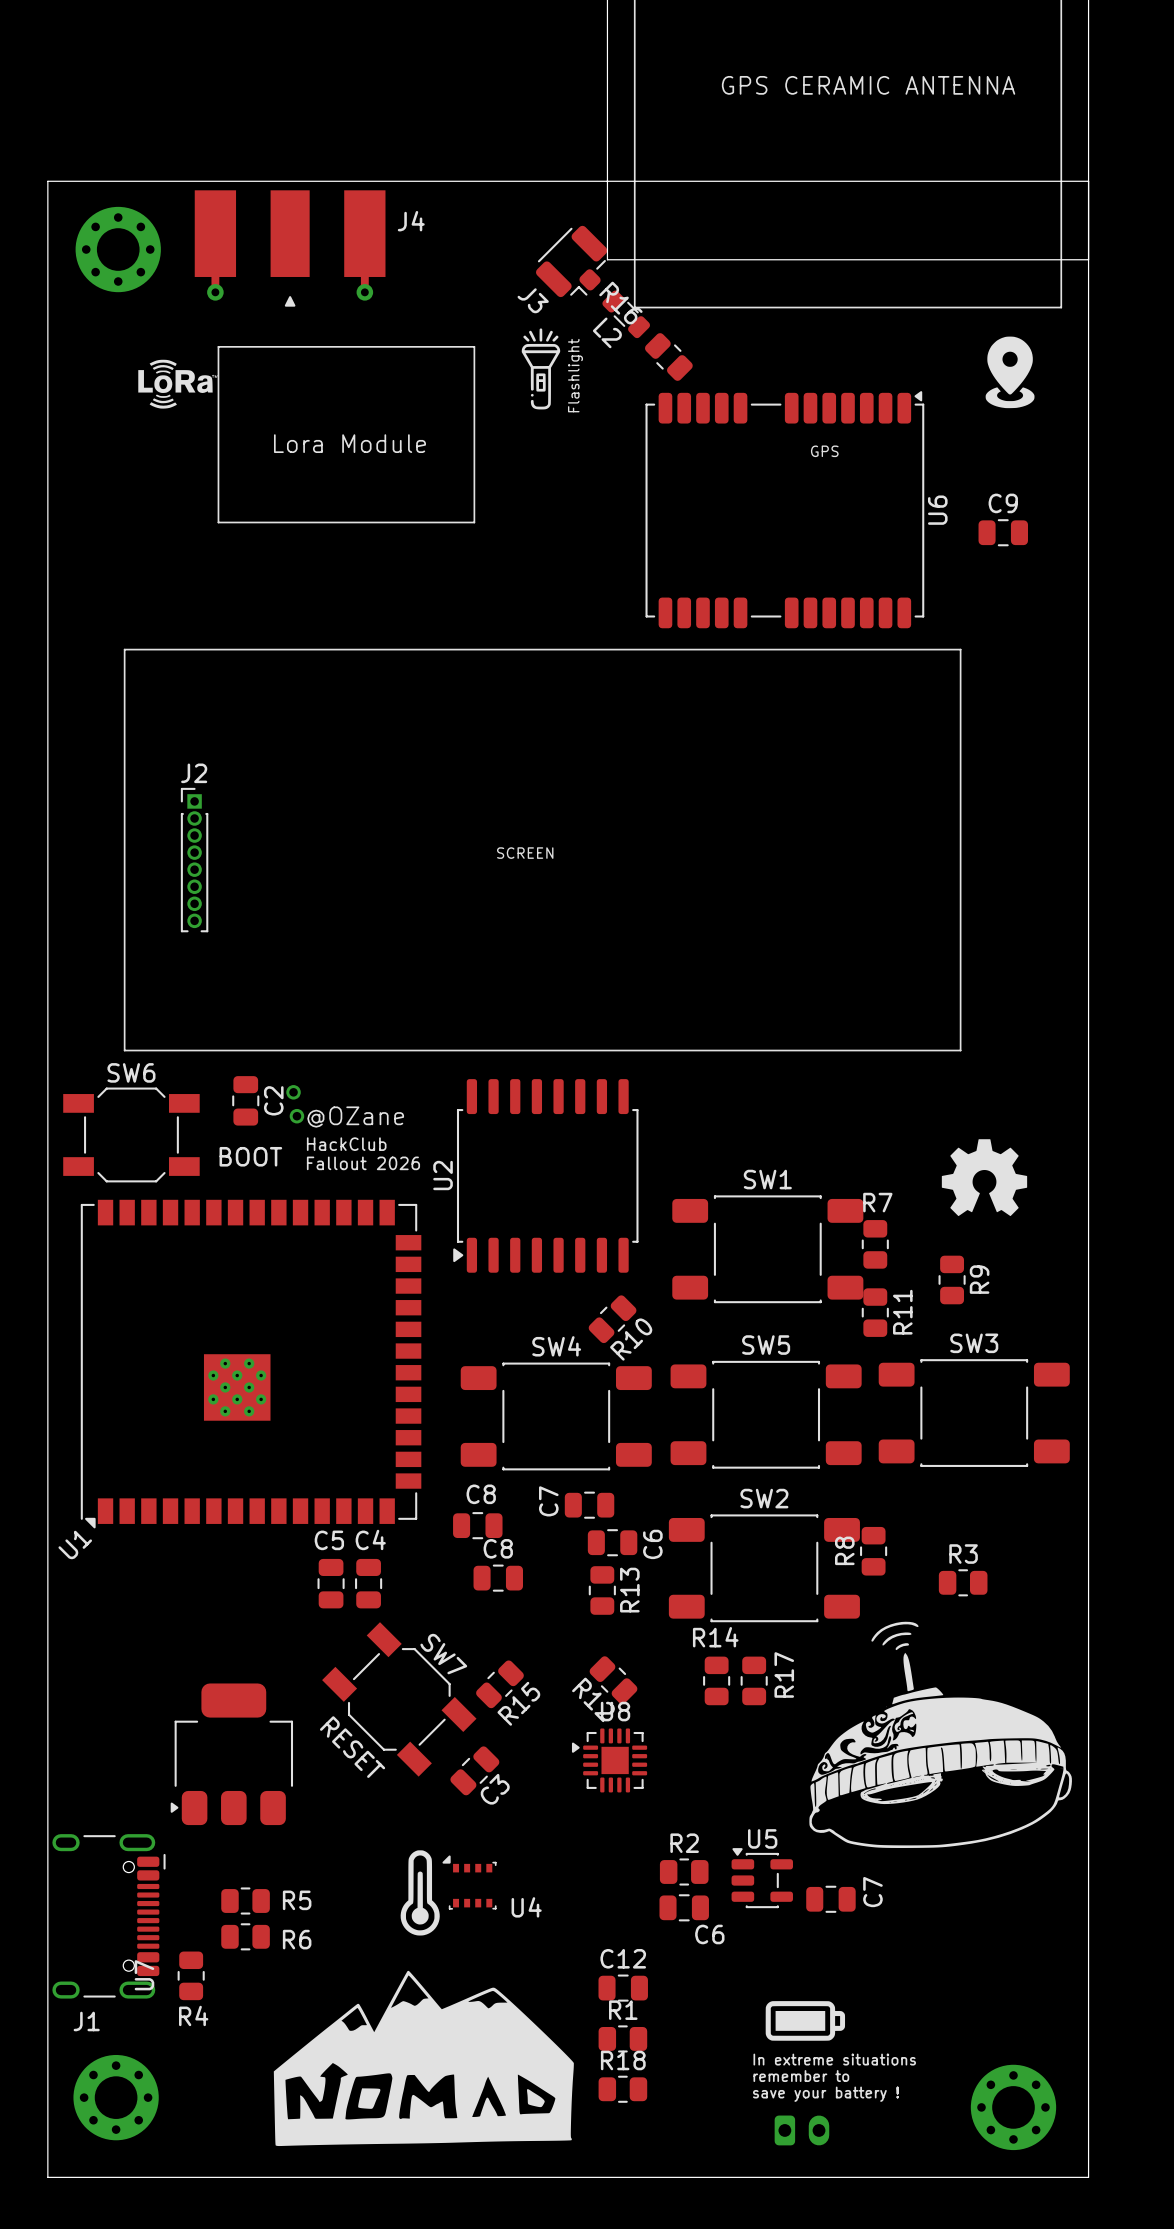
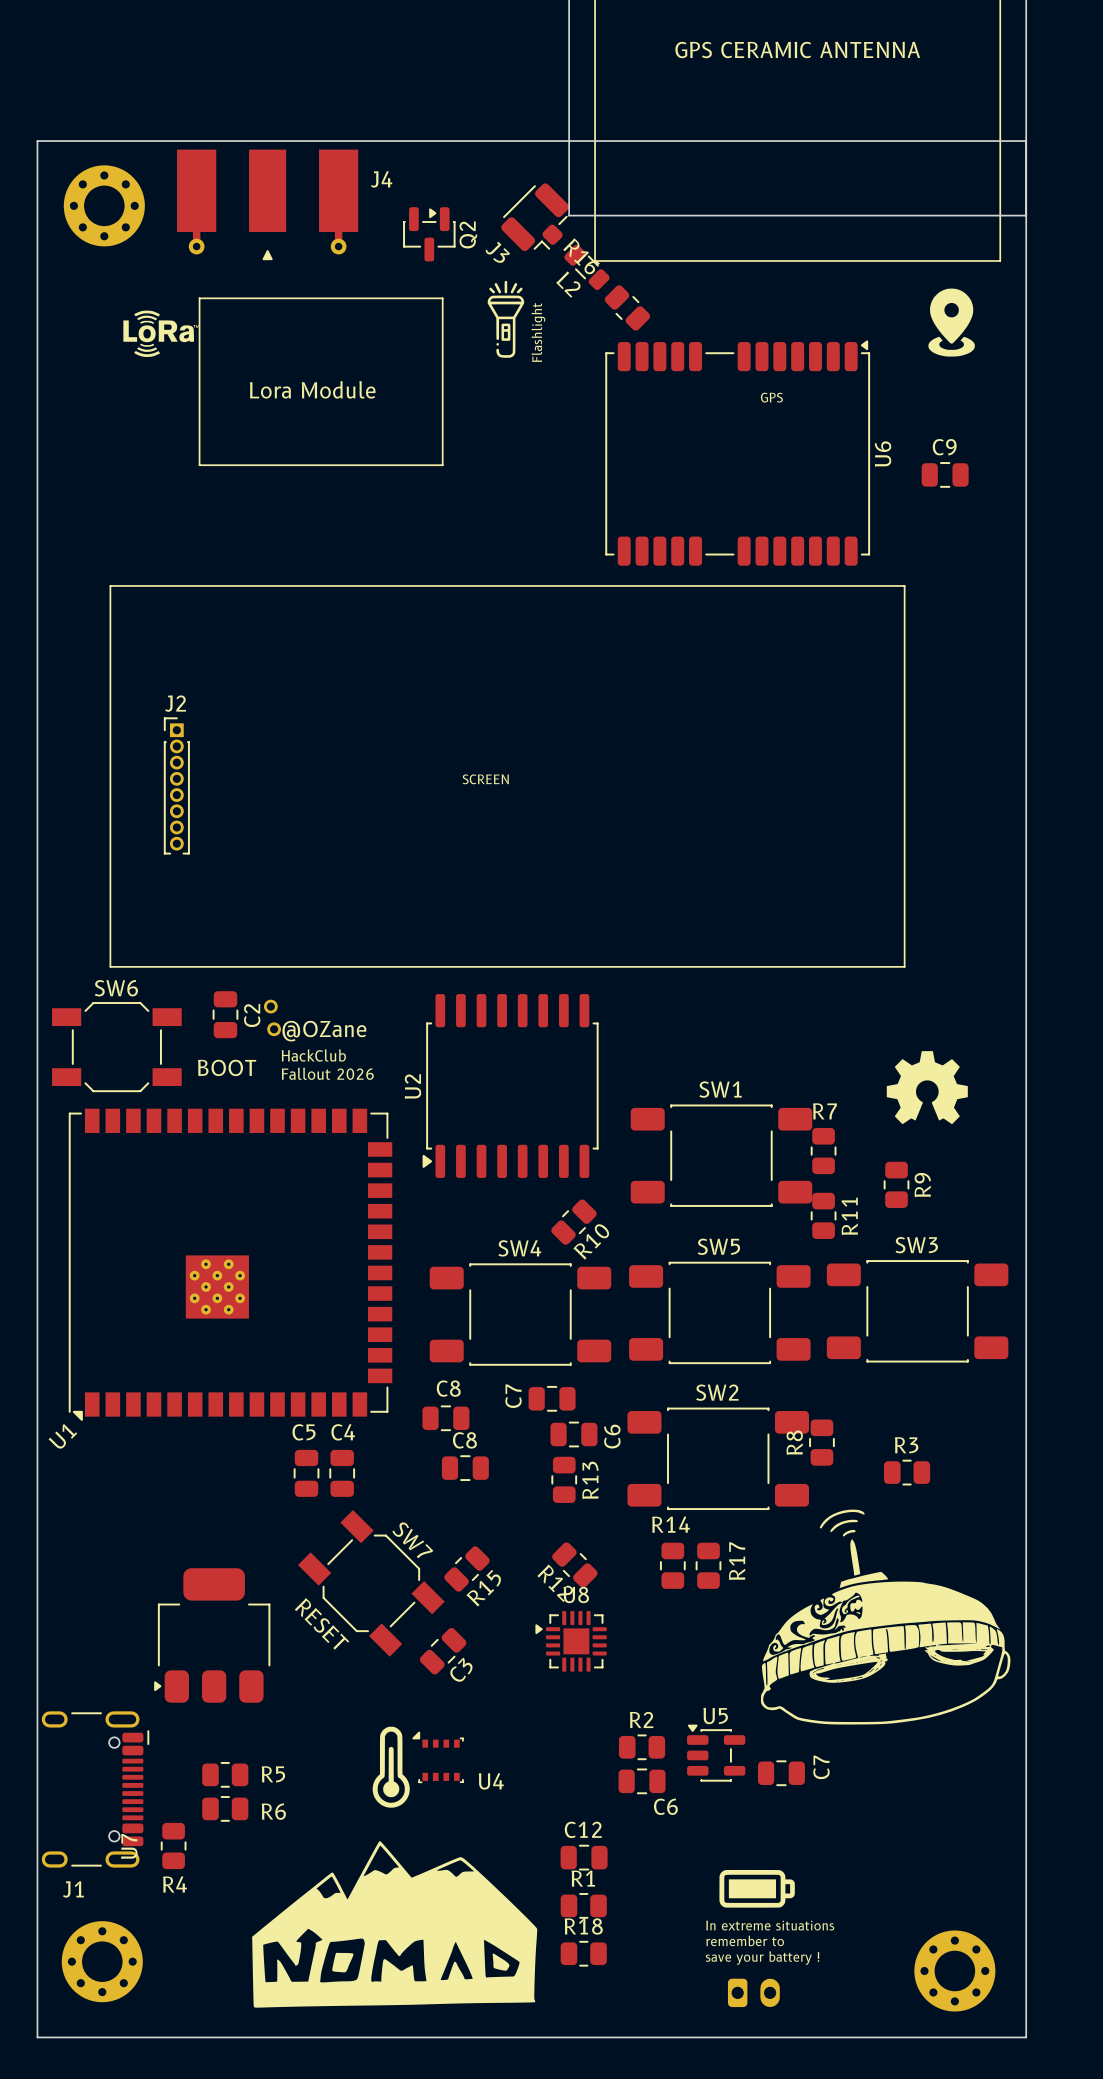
Q2: none -> (429, 234)

